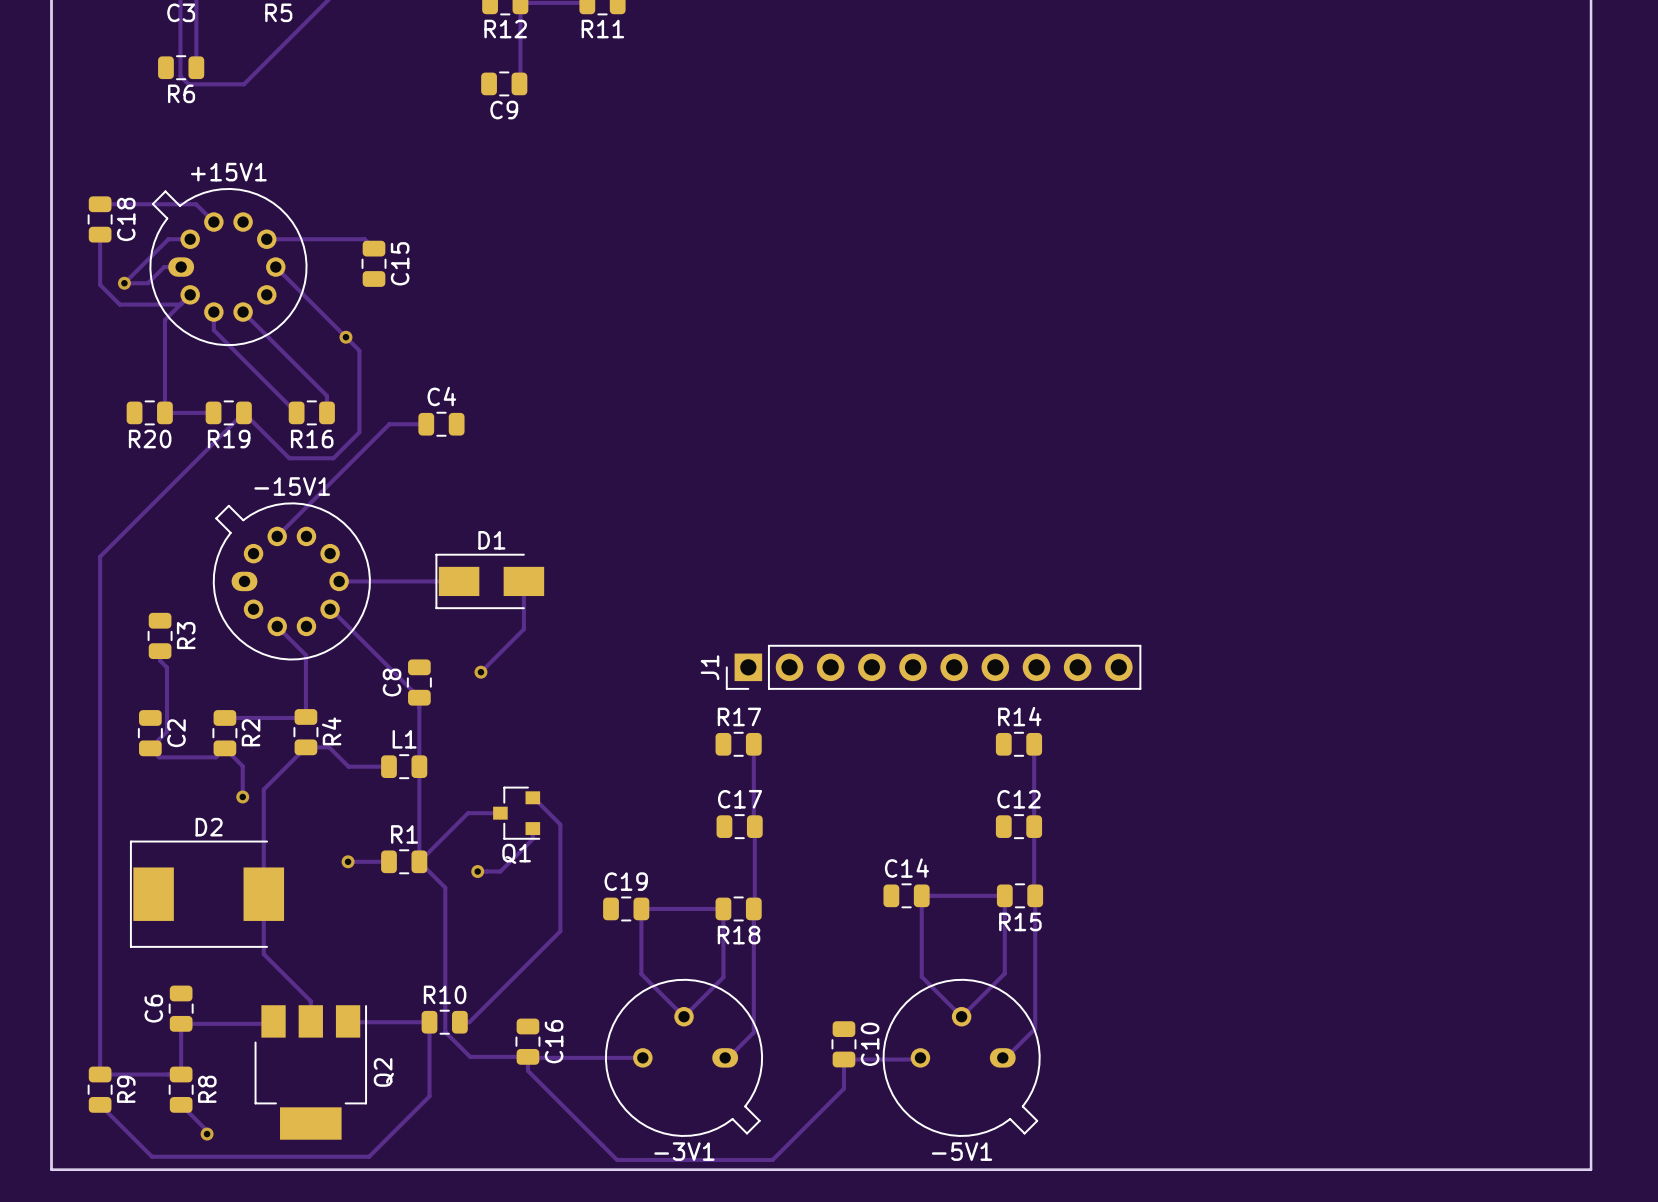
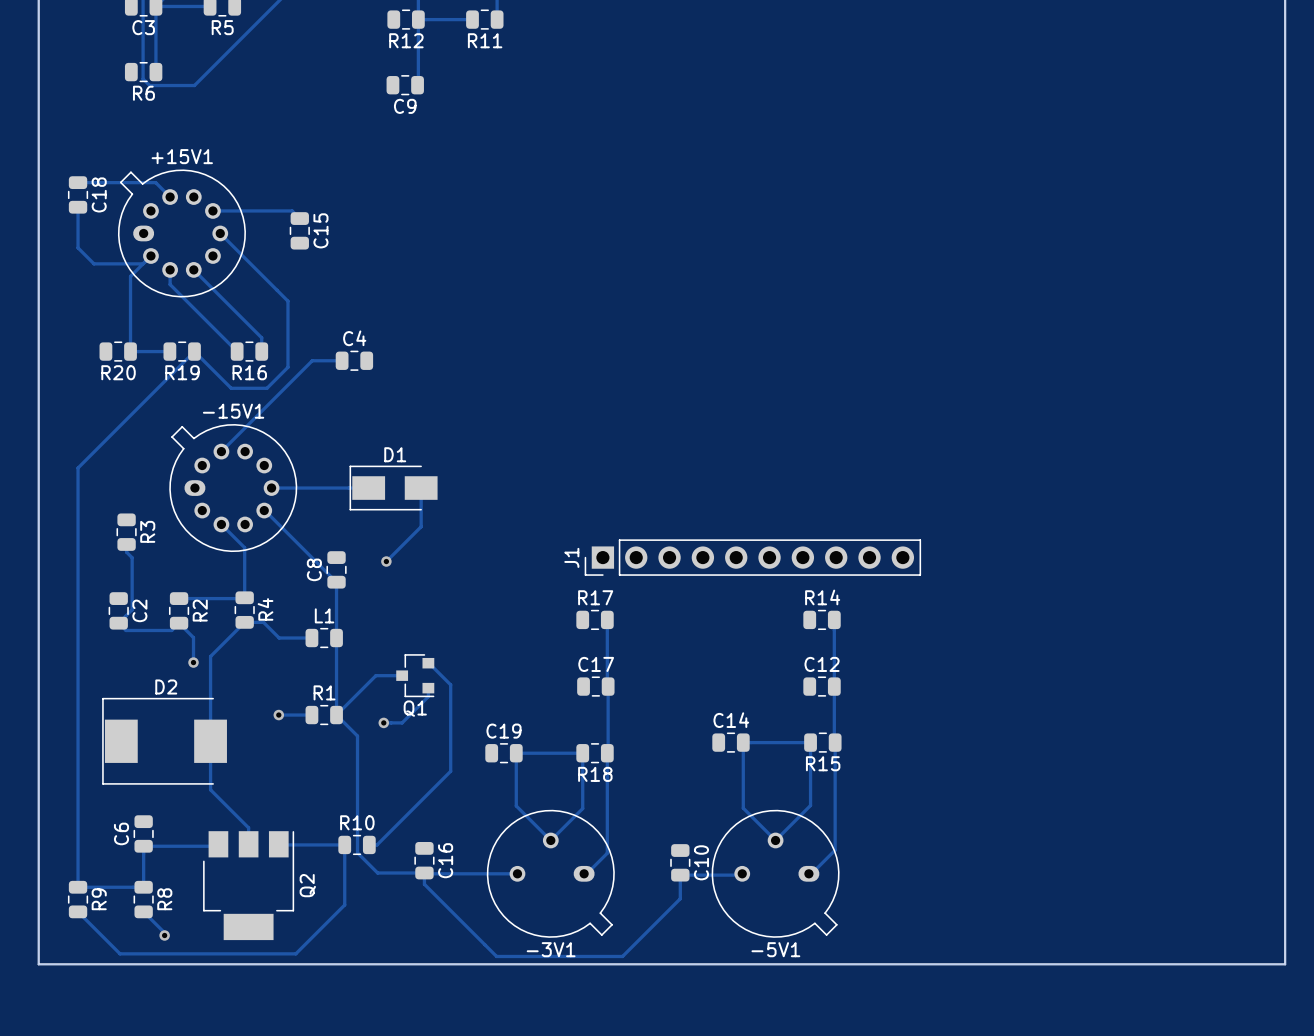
track: (190, 239) (168, 239) (124, 283) (147, 283) (164, 267) (181, 267) -> none
via: (124, 283) -> none
via: (345, 337) -> none

